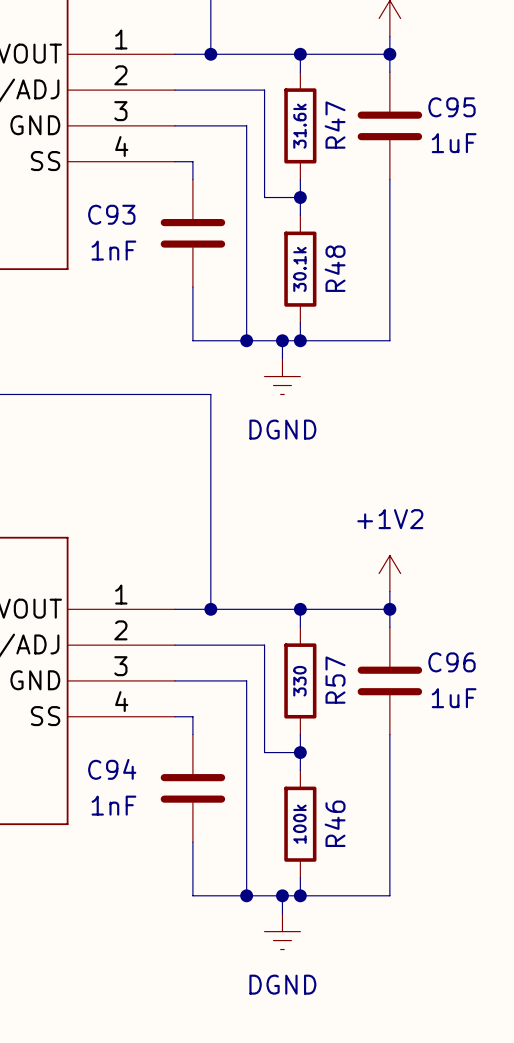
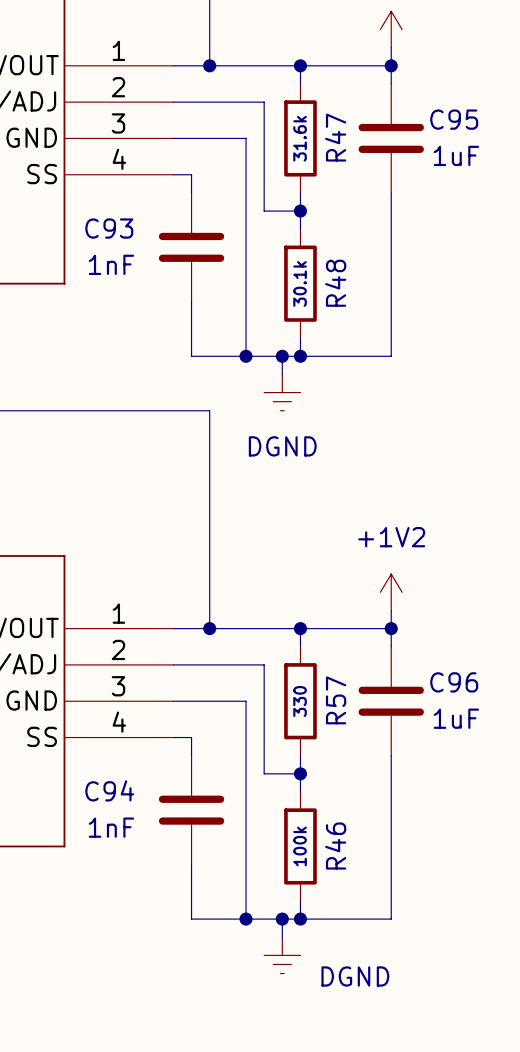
power symbol text position: DGND (282, 984) -> DGND (355, 976)

